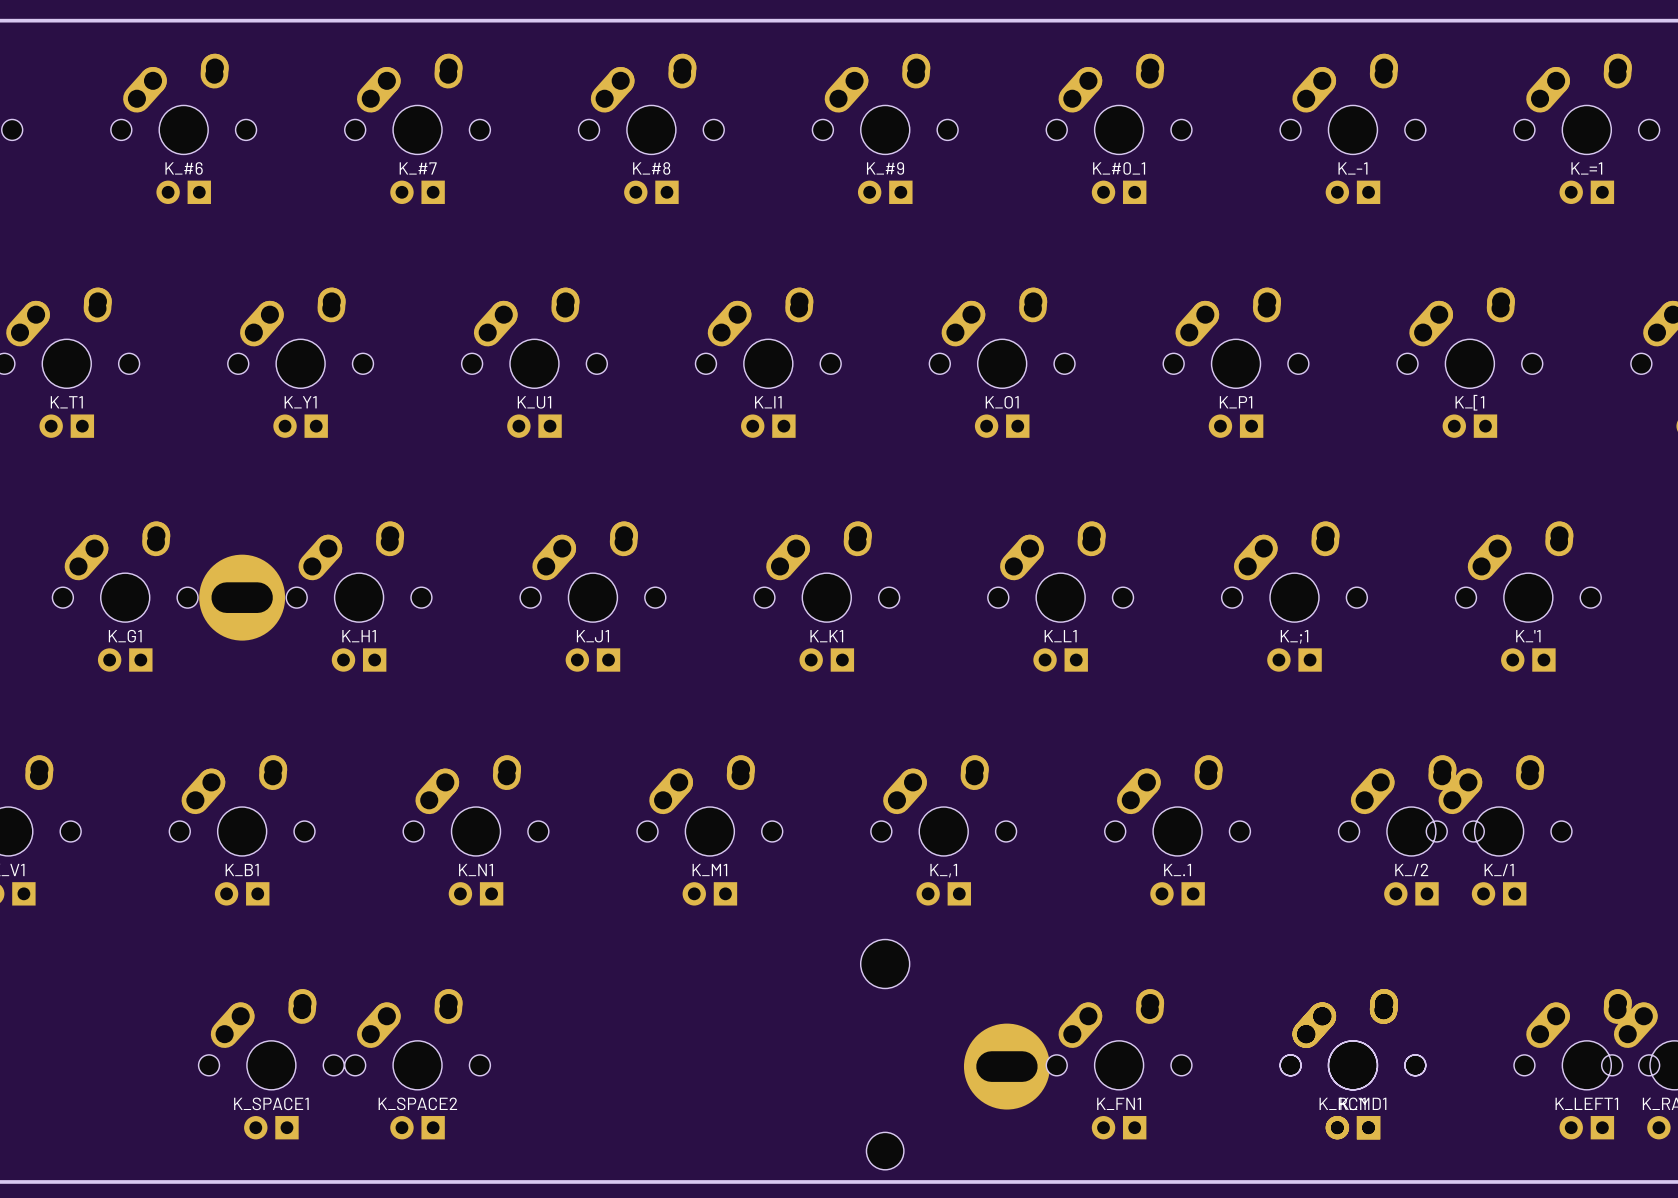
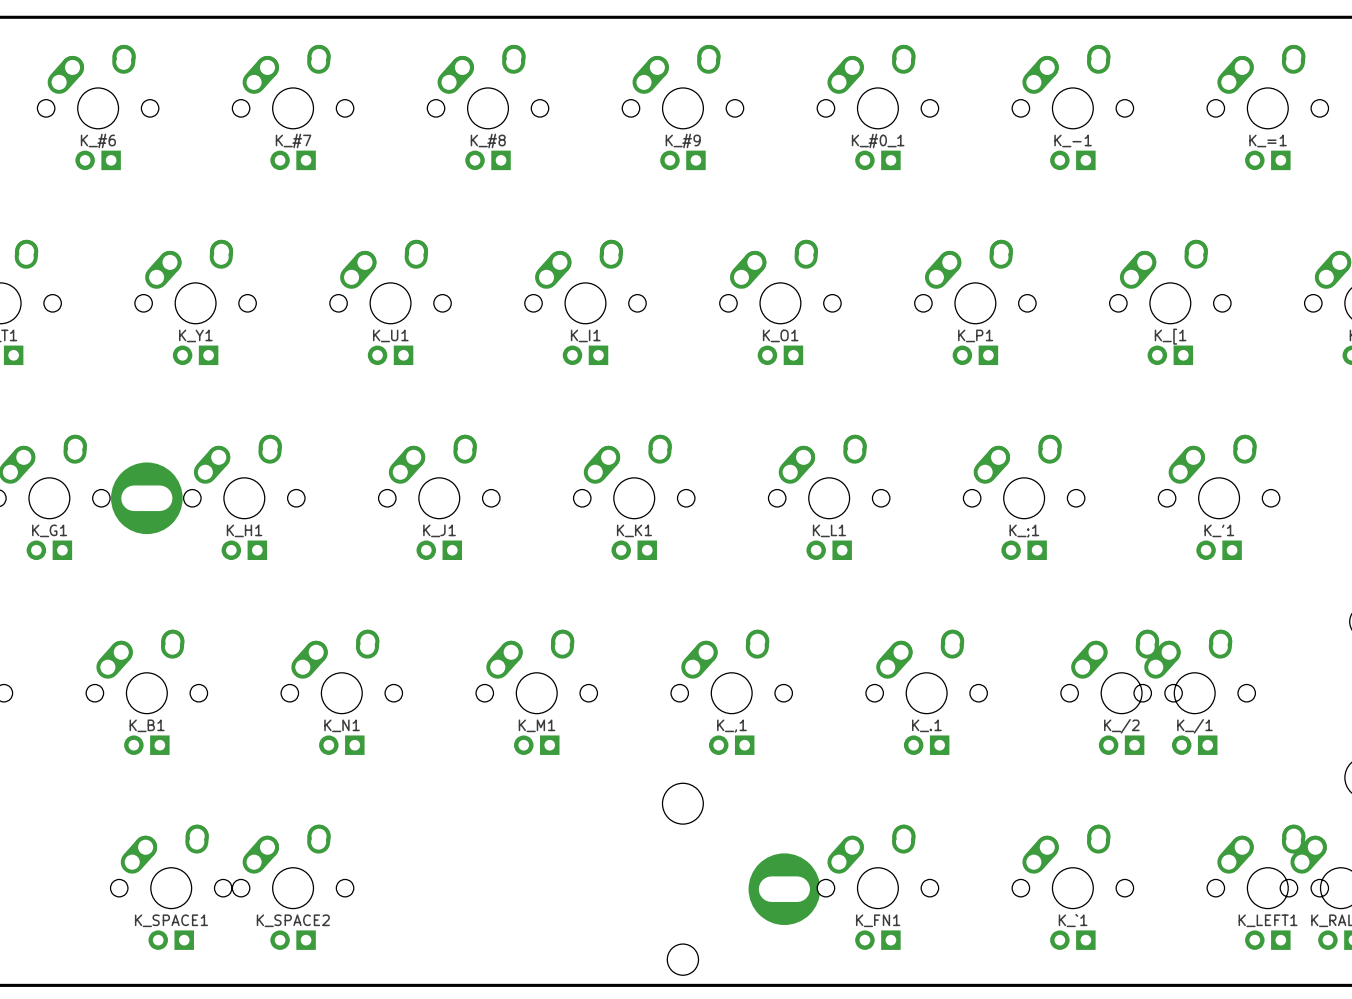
K_RCMD1: (1352, 1064) -> none

